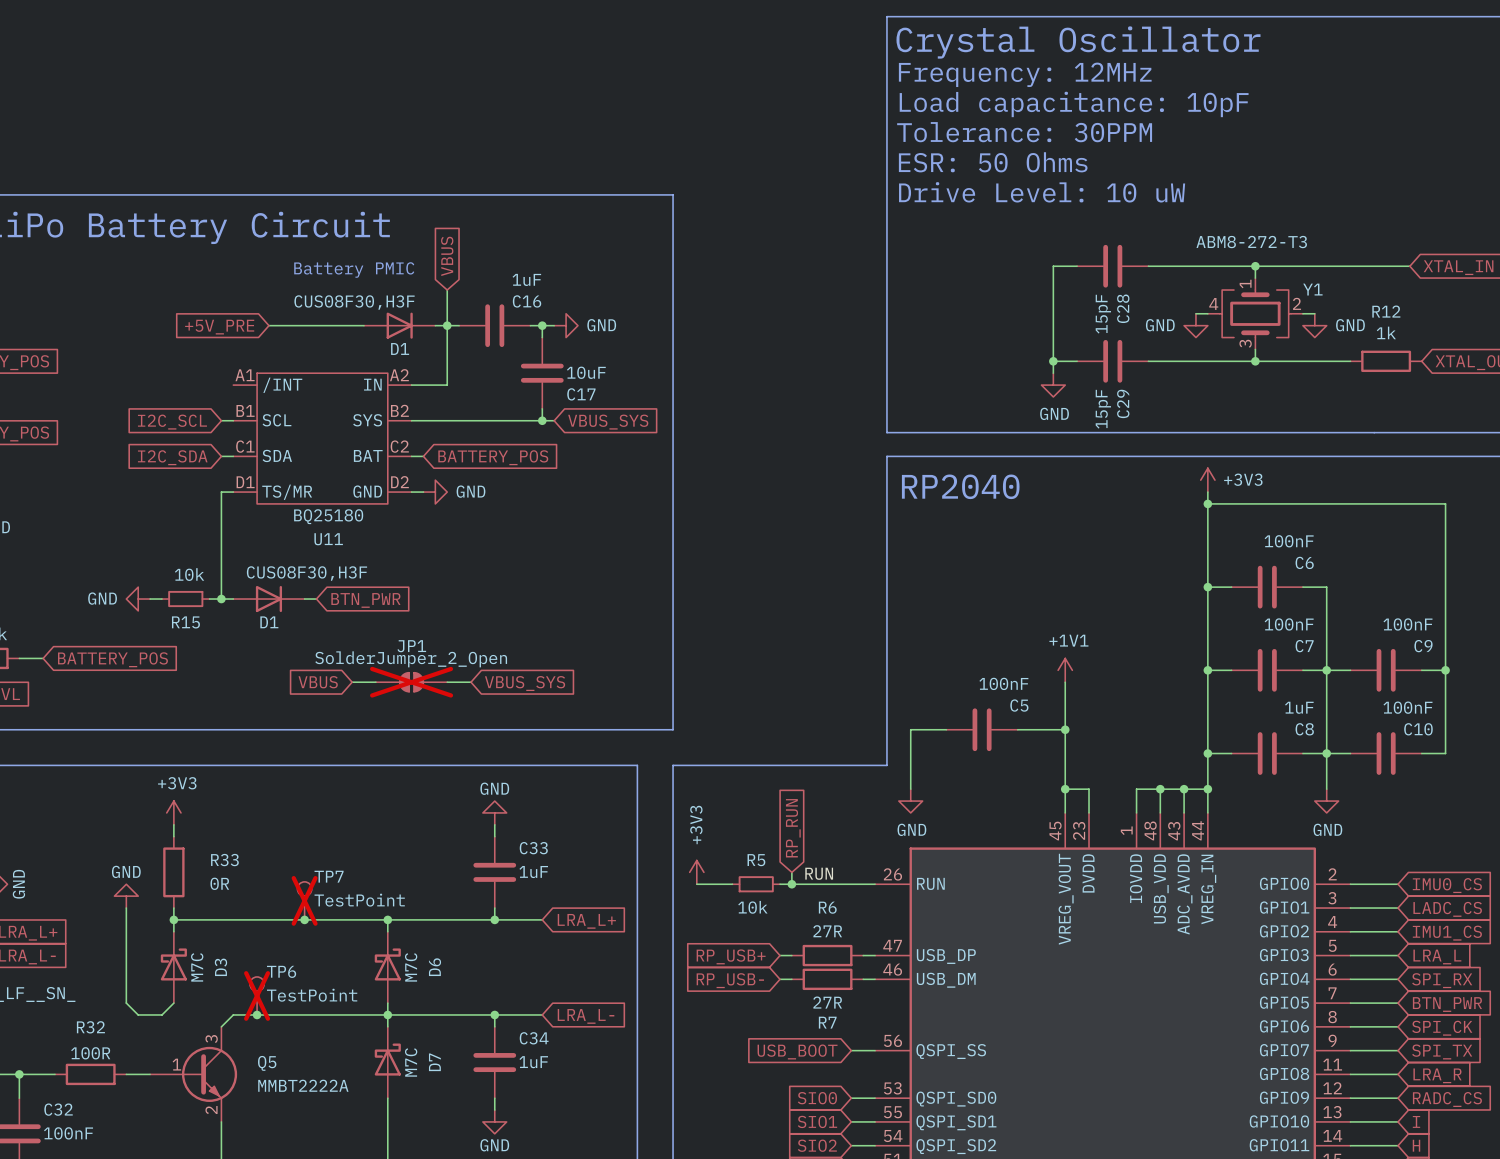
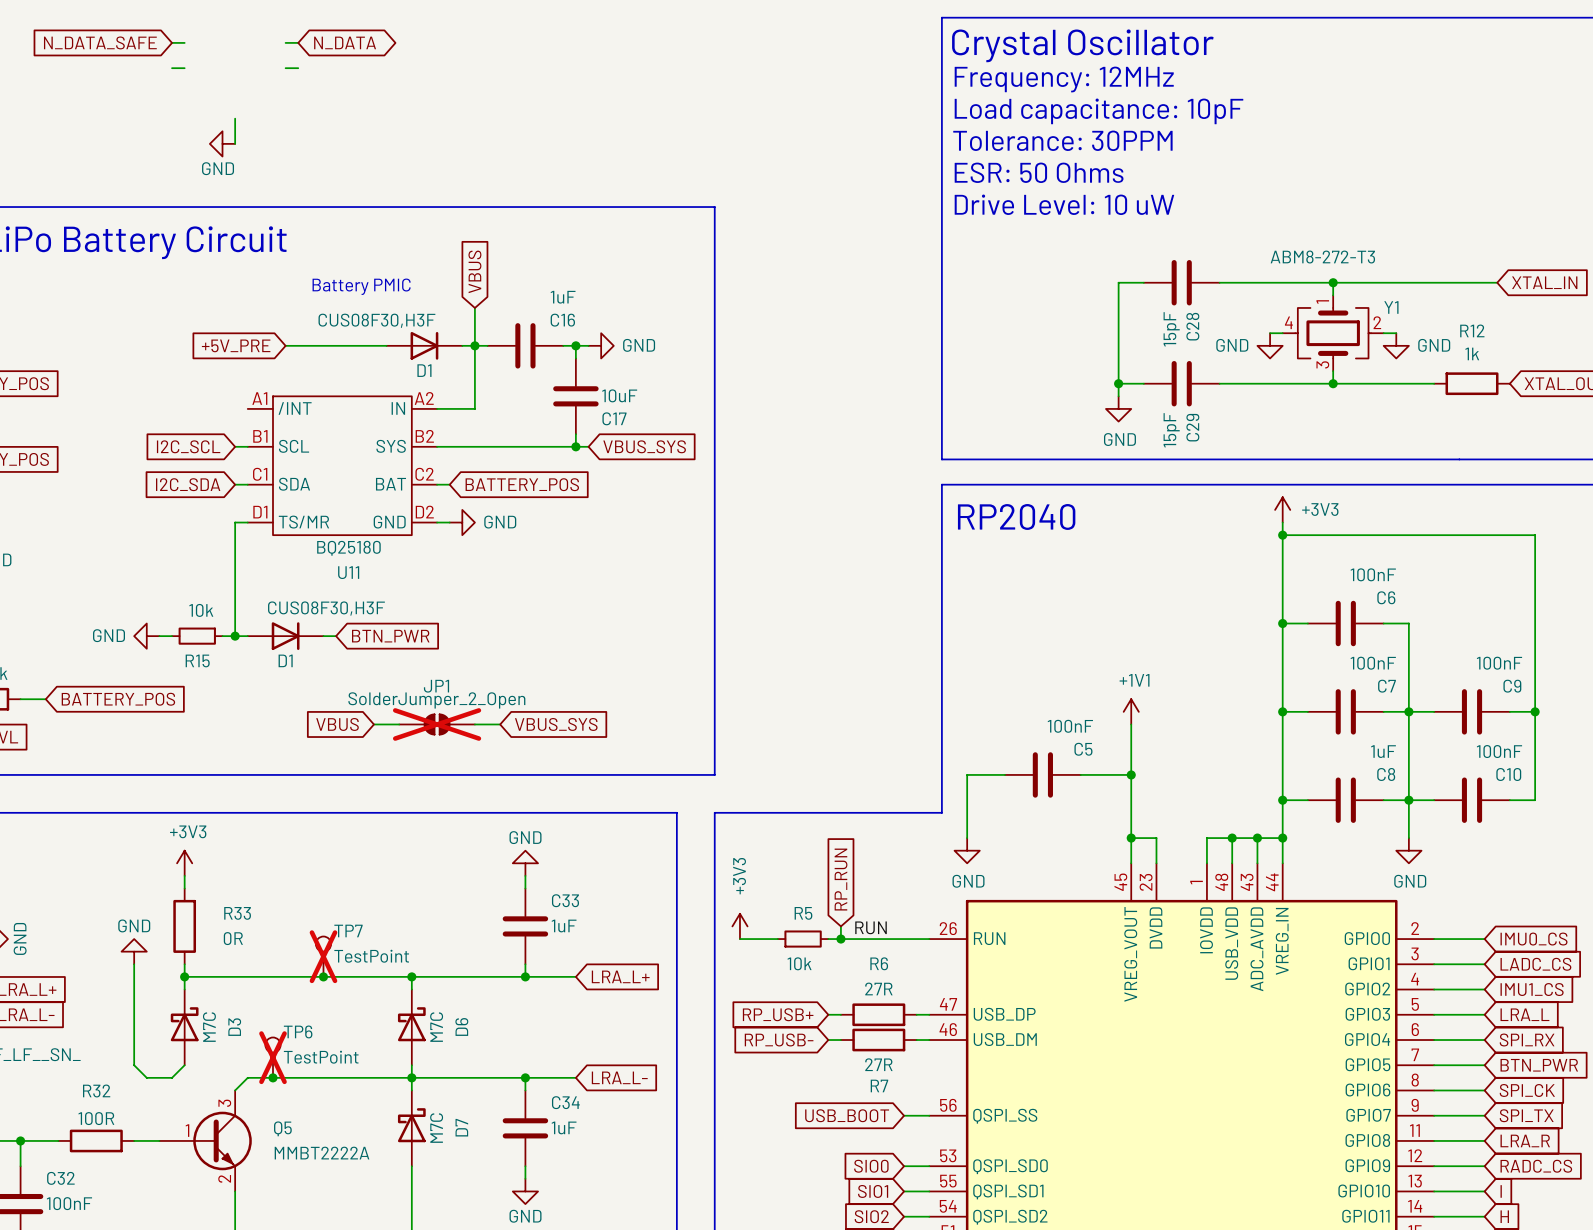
wire: none -> (172, 42) (184, 42)
wire: none -> (285, 42) (298, 42)
global label: none -> N_DATA_SAFE (100, 42)
global label: none -> N_DATA (345, 42)
wire: none -> (172, 68) (184, 68)
wire: none -> (285, 68) (298, 68)
wire: none -> (235, 118) (235, 143)
power symbol: none -> GND (222, 143)

